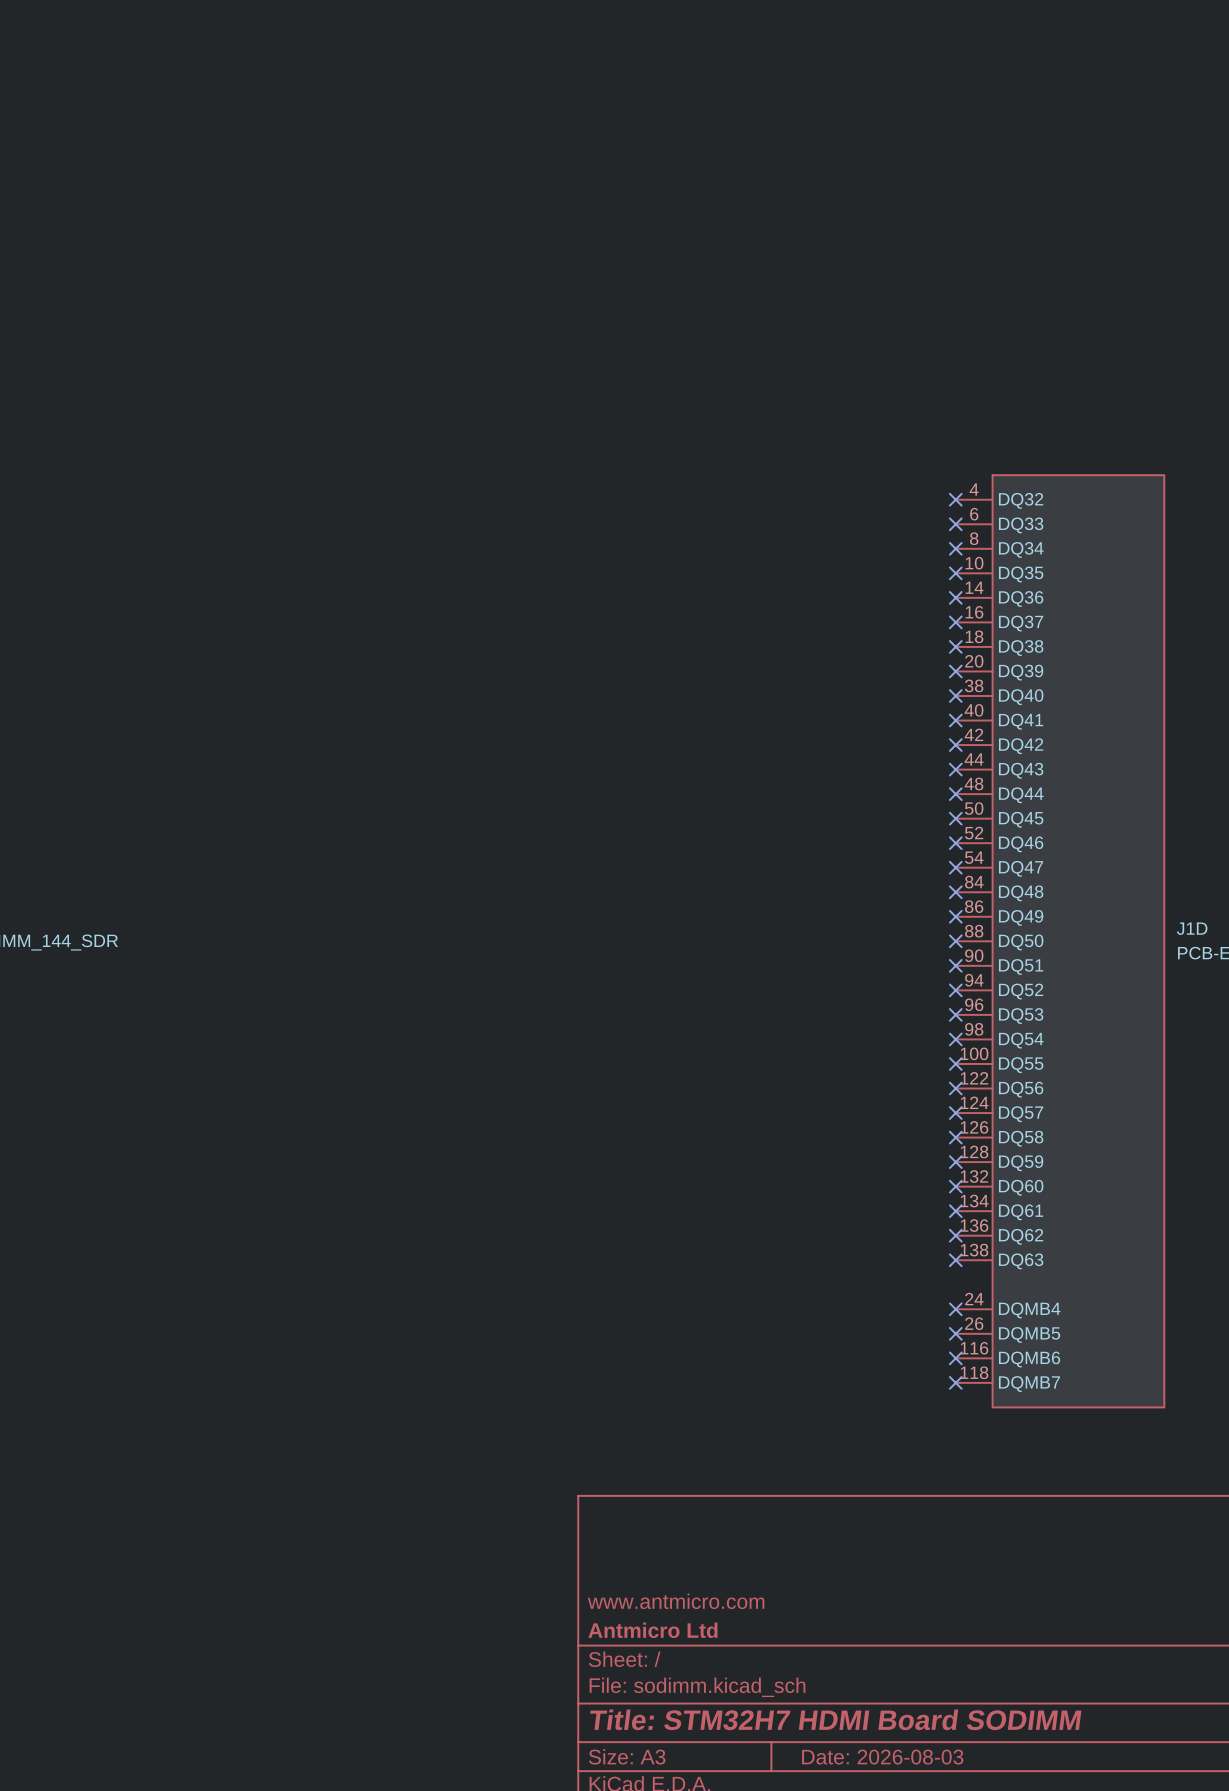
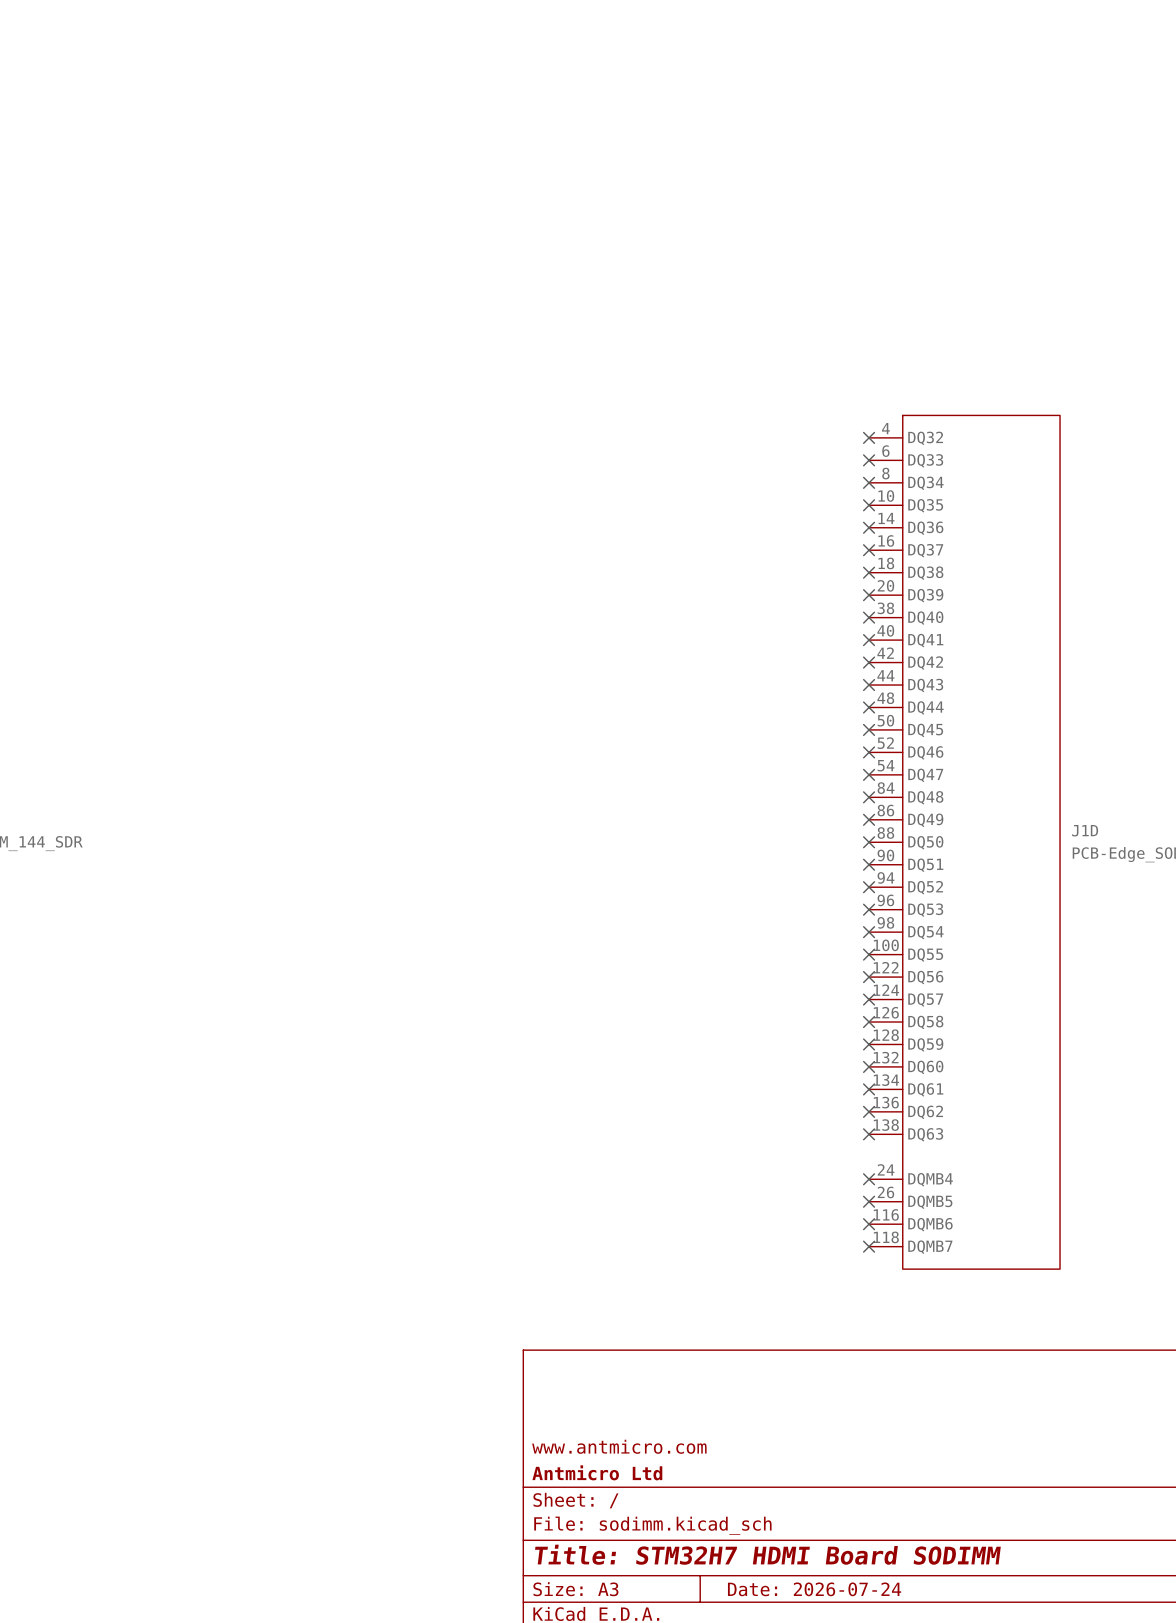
title block: Date: 2026-08-03 (882, 1757) -> Date: 2026-07-24 (814, 1589)

